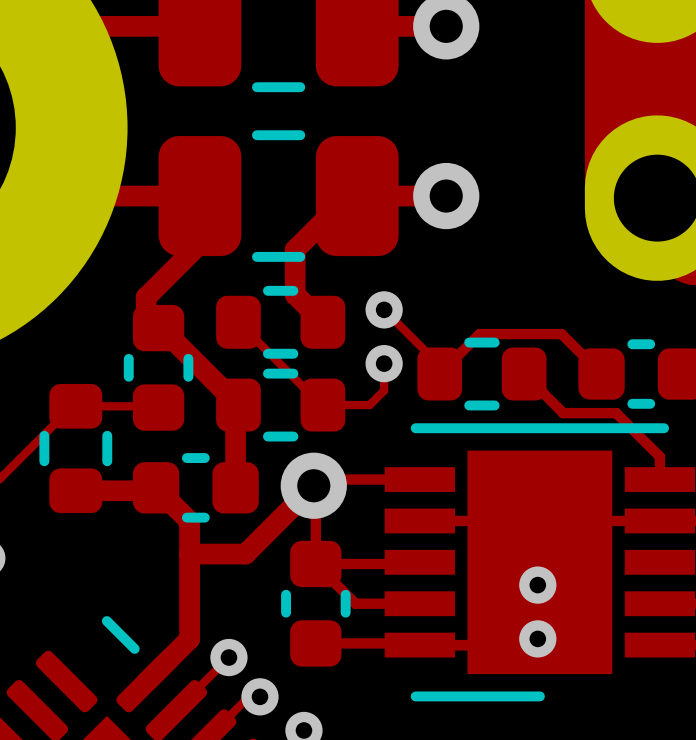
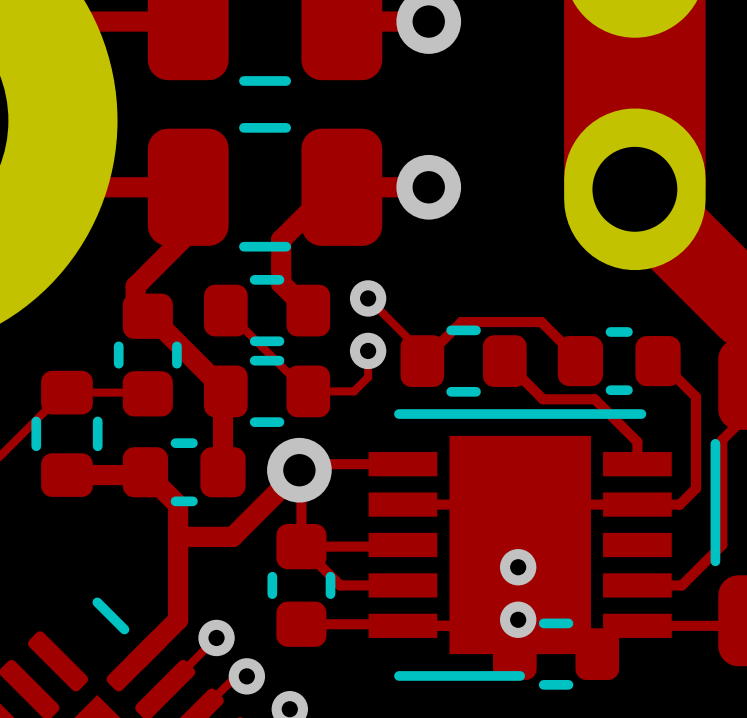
part: none -> (556, 654)

